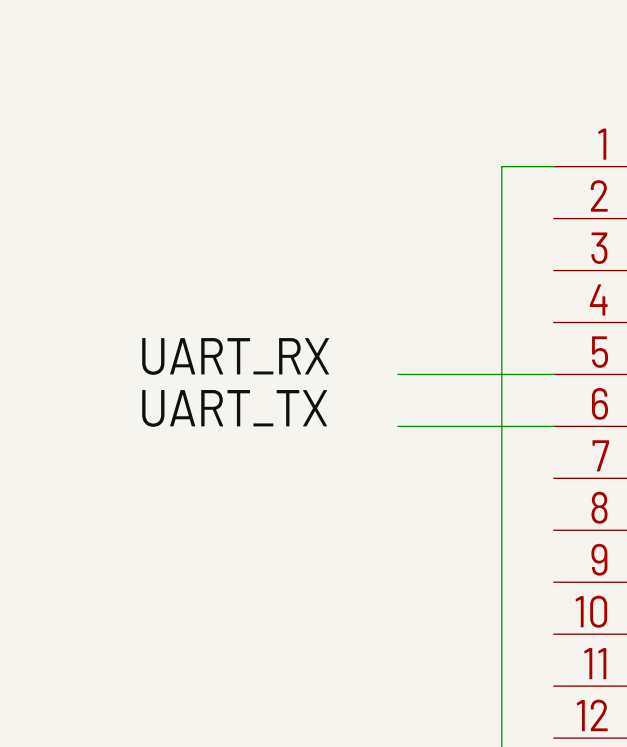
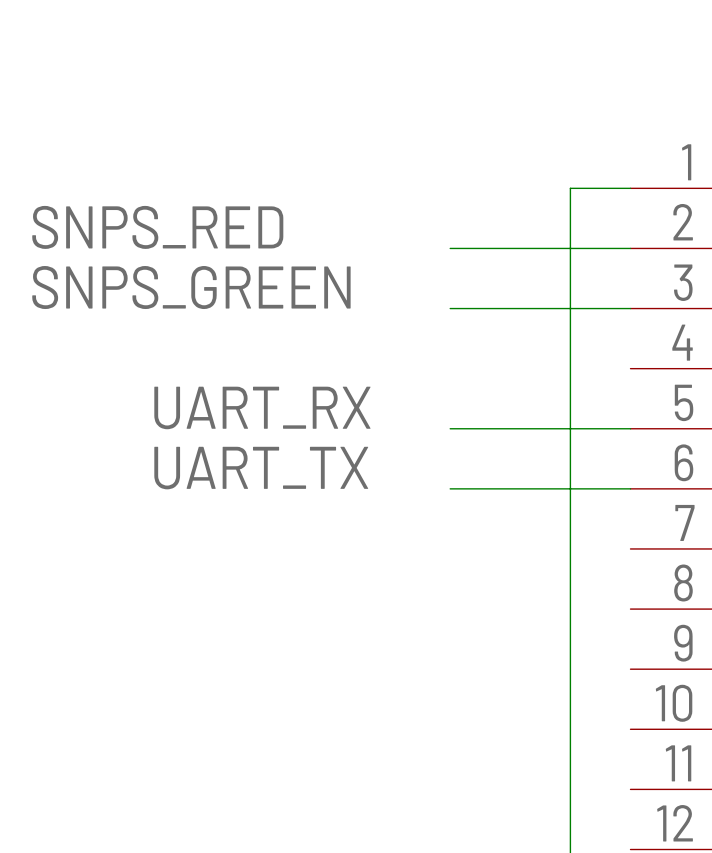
label: none -> SNPS_RED (157, 227)
wire: none -> (450, 248) (630, 248)
label: none -> SNPS_GREEN (191, 287)
wire: none -> (450, 308) (630, 308)

